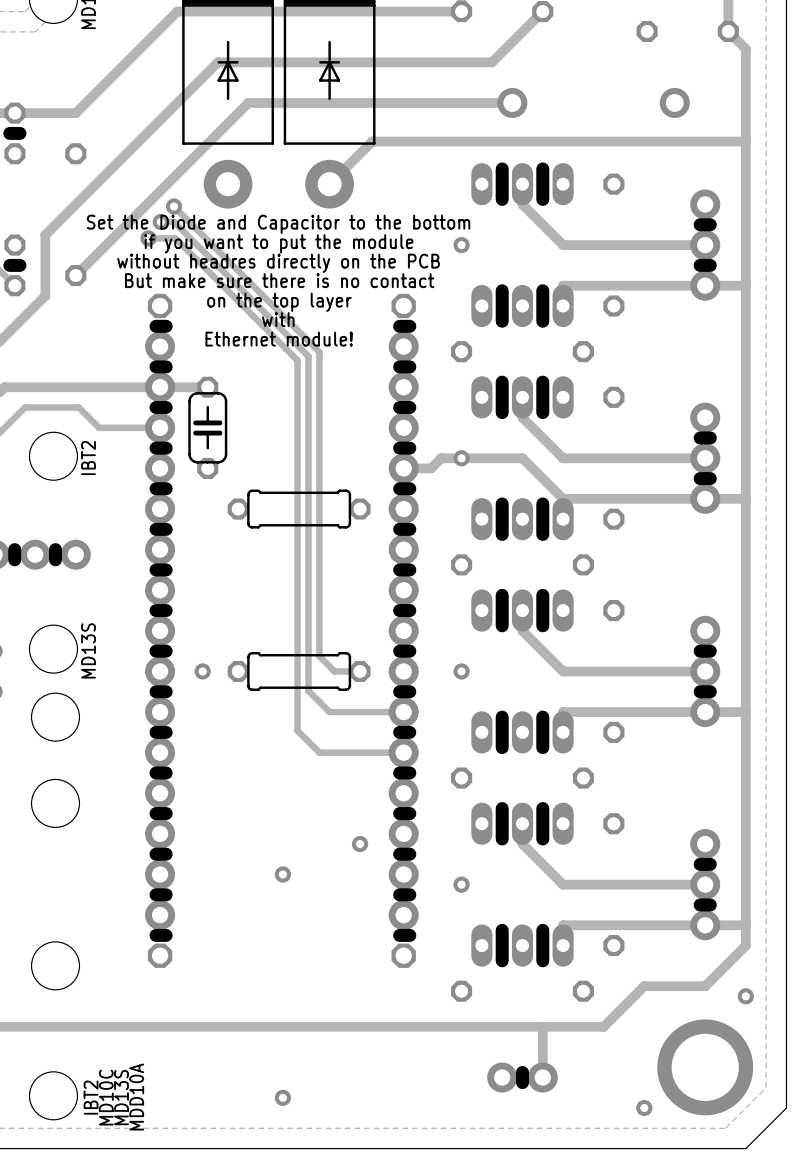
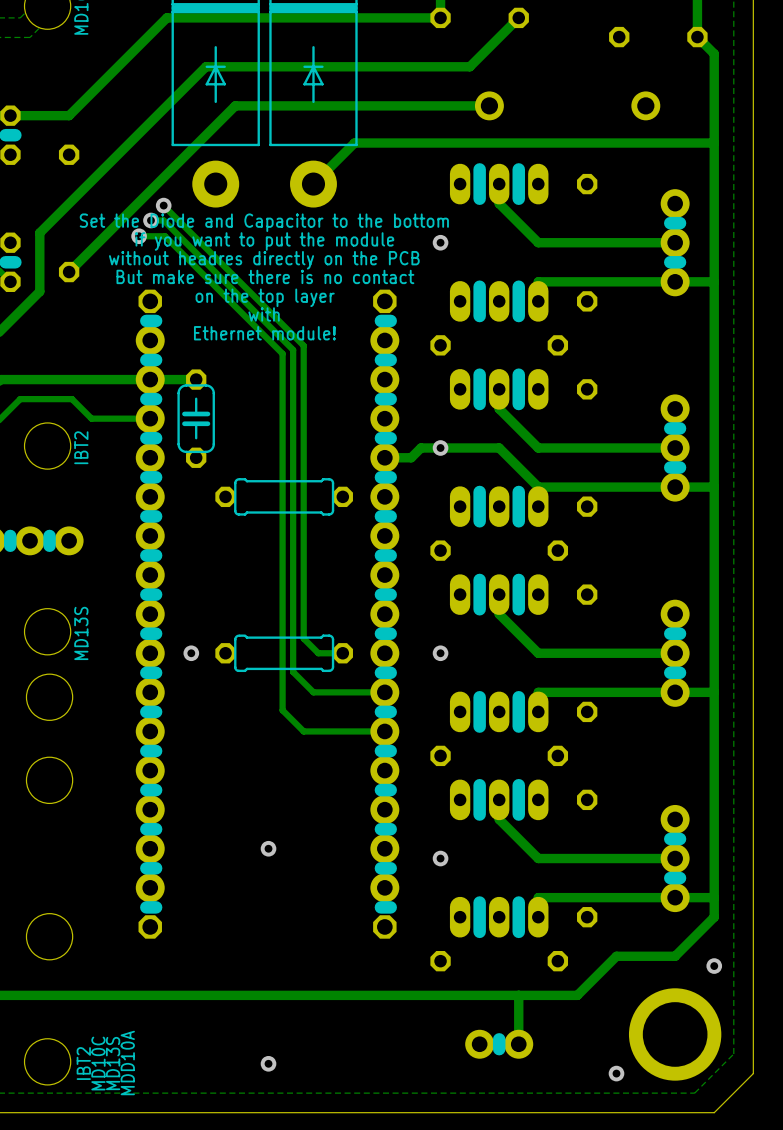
via: (360, 844) -> none

